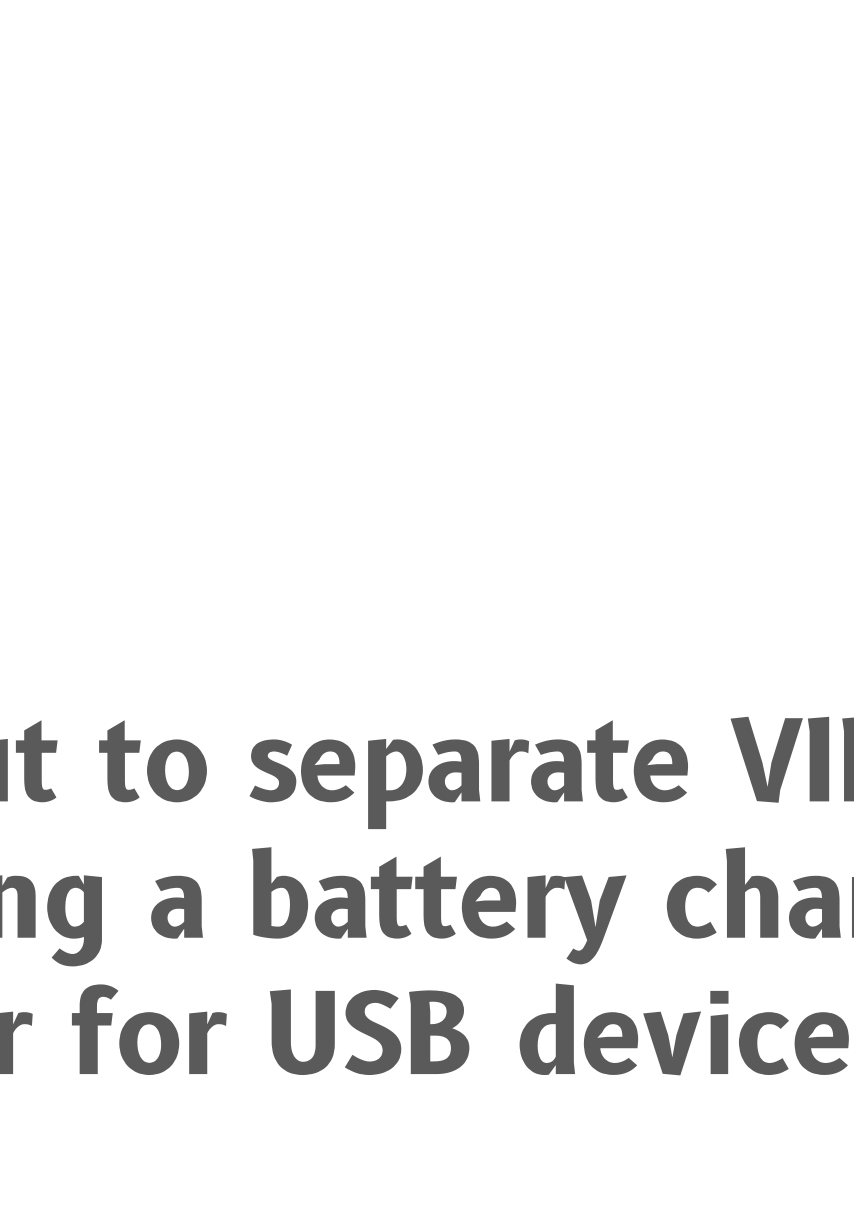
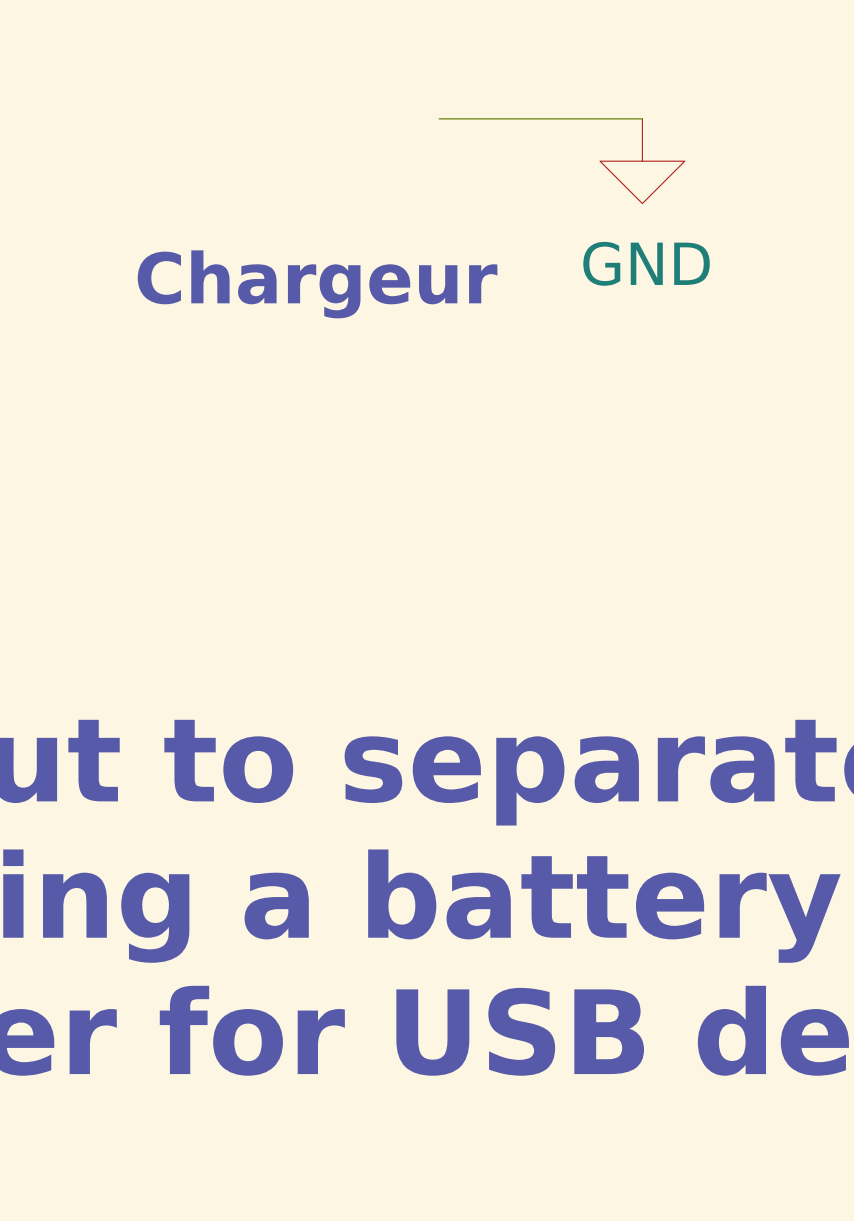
wire: none -> (439, 118) (642, 118)
power symbol: none -> GND (642, 161)
text: none -> Chargeur (317, 284)

